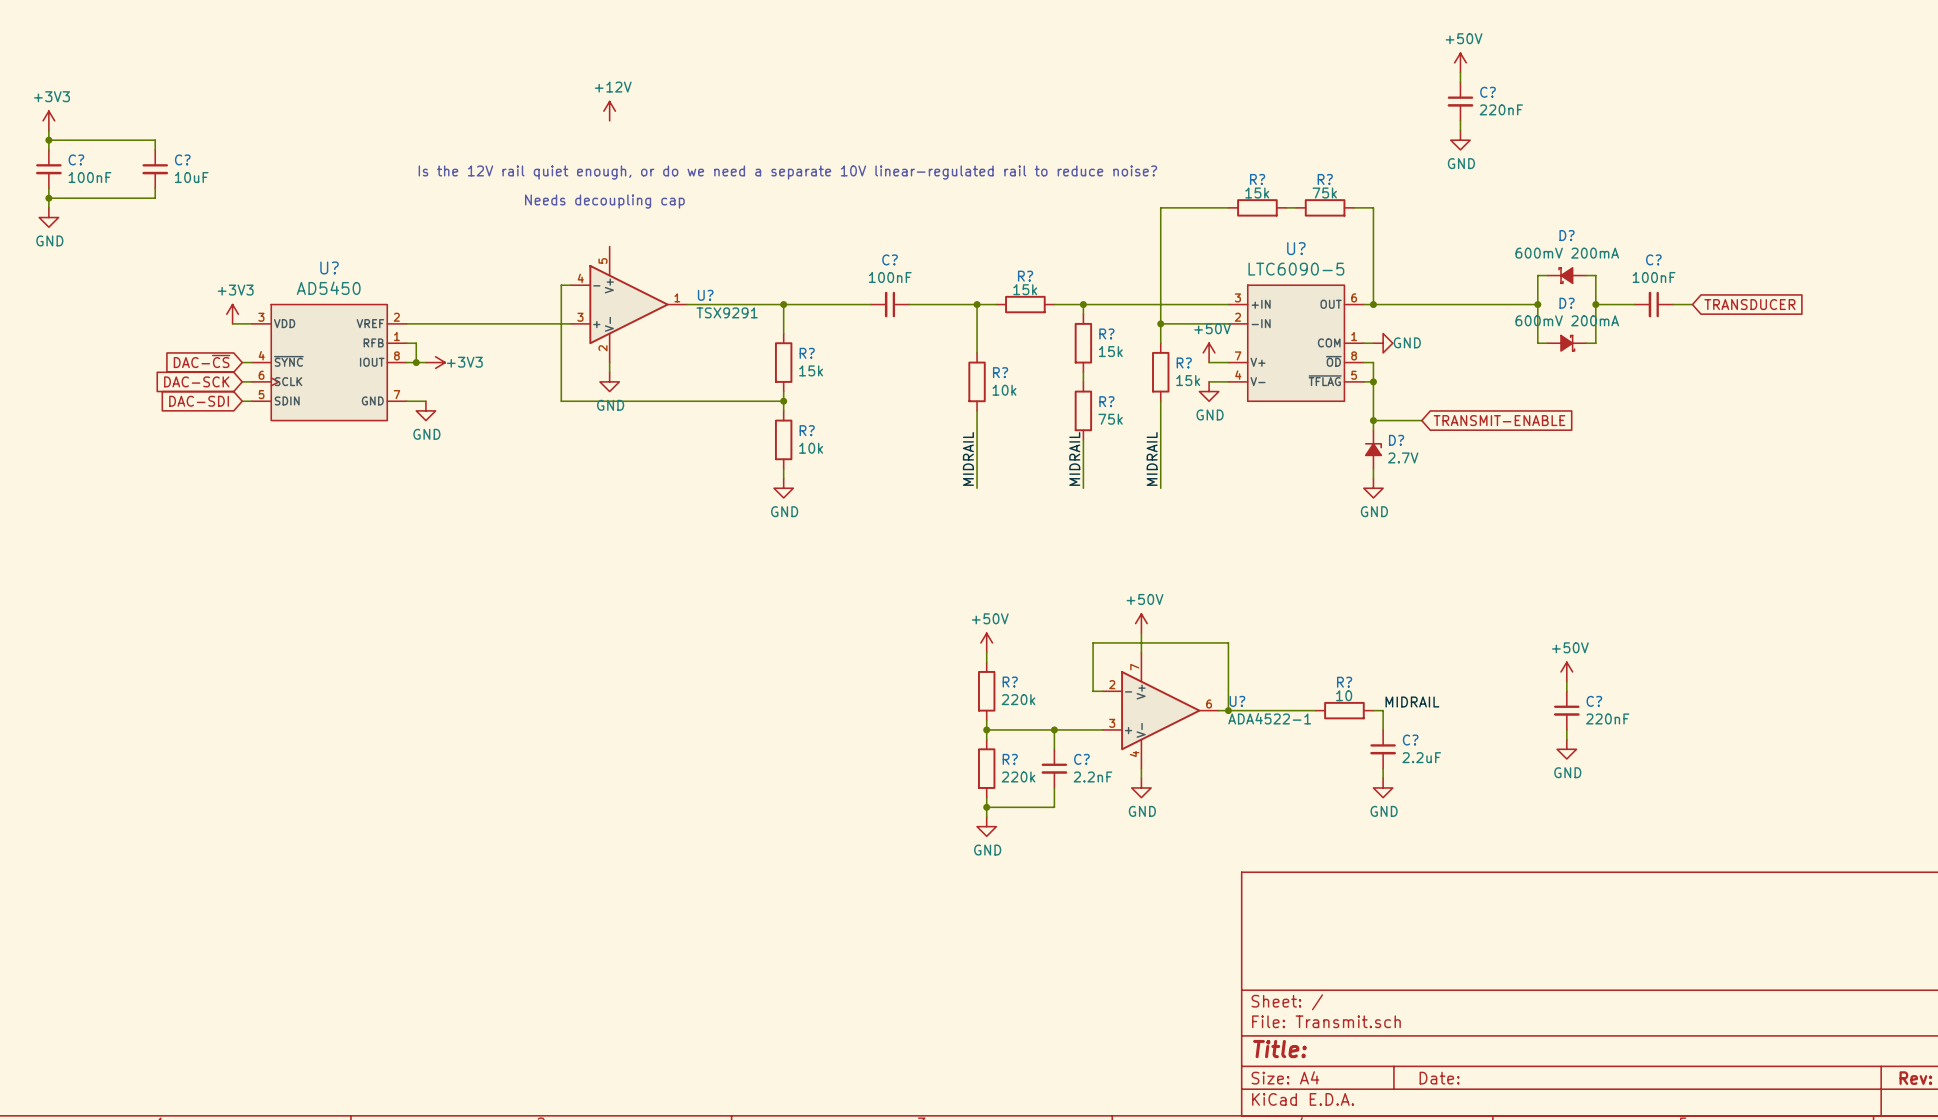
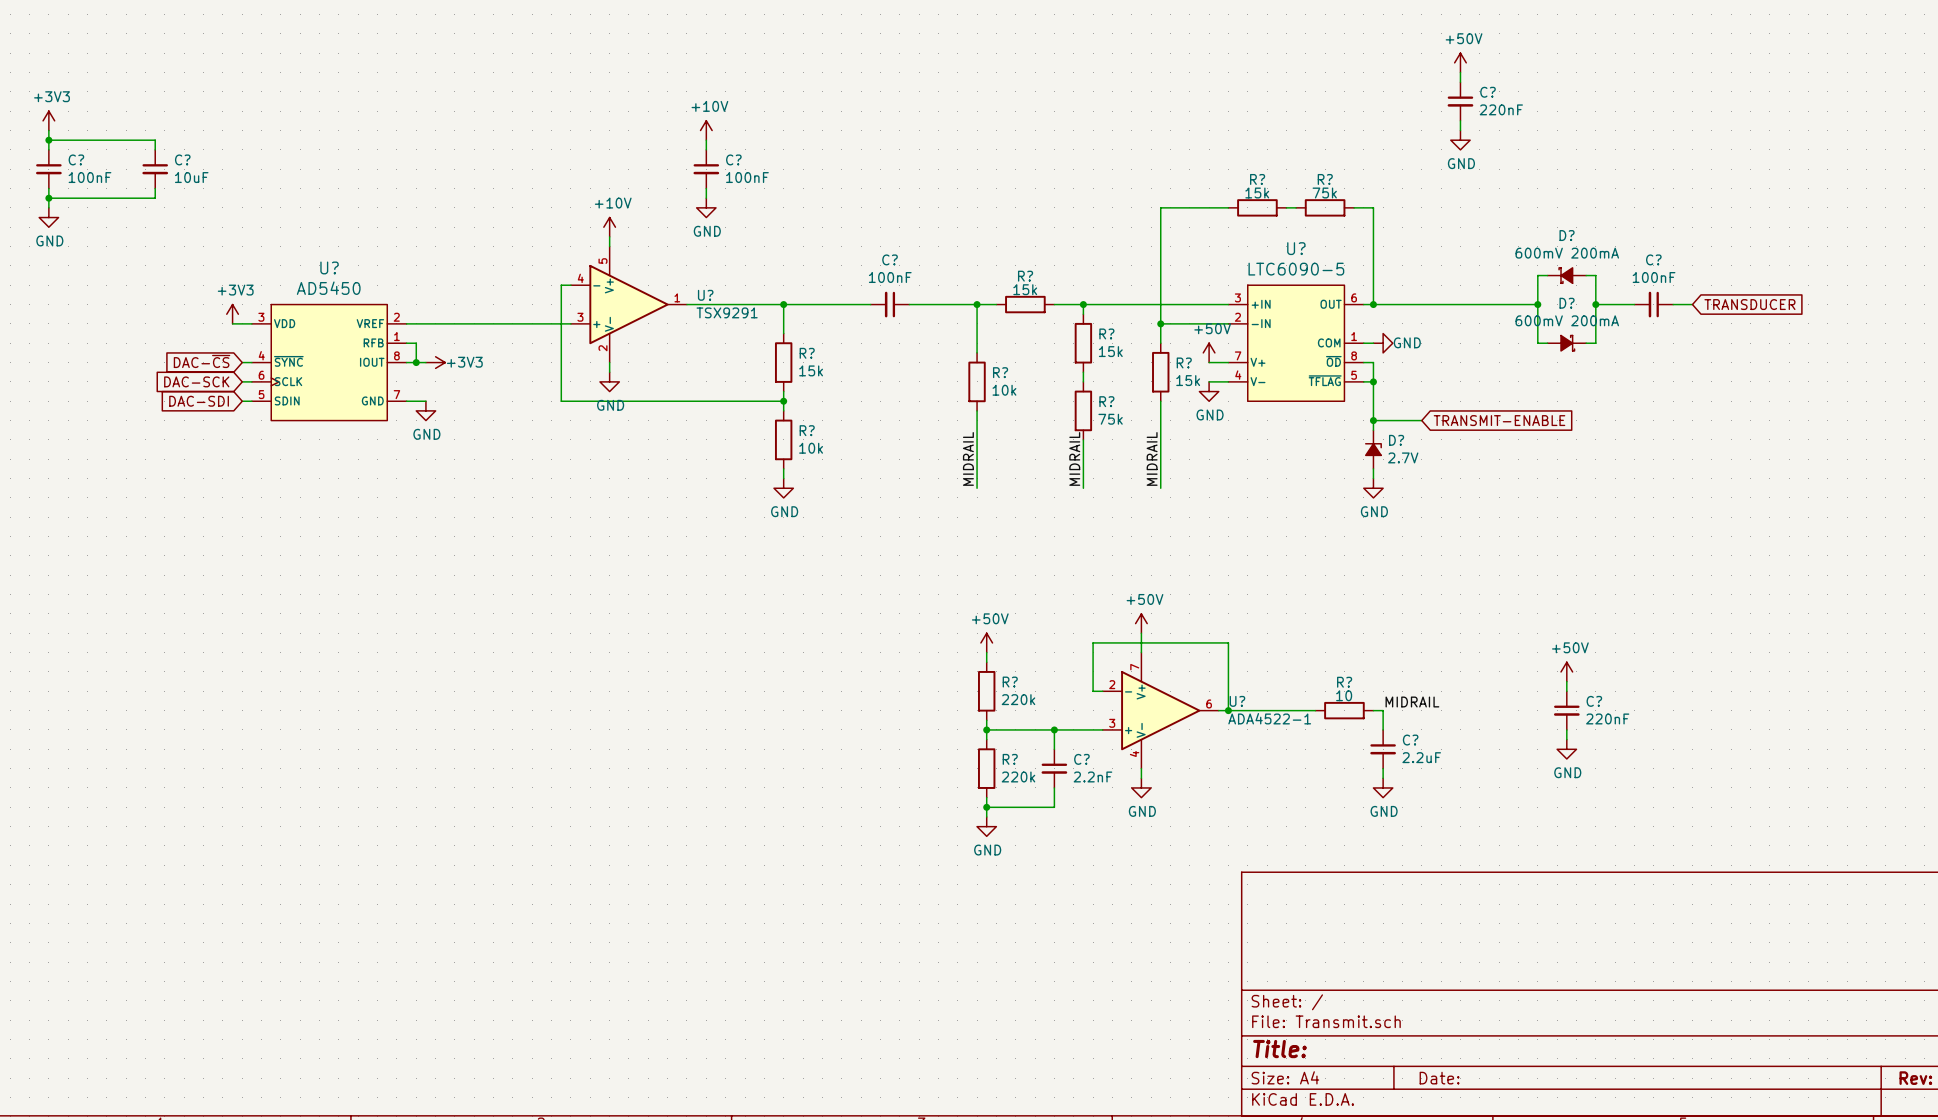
power symbol: +12V (609, 111) -> none
power symbol: none -> +10V (706, 130)
wire: none -> (706, 140) (706, 149)
C?: none -> 100nF (706, 169)
text: Is the 12V rail quiet enough, or do we need a separate 10V linear-regulated rail to reduce noise? (787, 172) -> none
wire: none -> (706, 188) (706, 198)
text: Needs decoupling cap (604, 201) -> none
power symbol: none -> GND (706, 207)
power symbol: none -> +10V (609, 227)
wire: none -> (609, 236) (609, 246)

